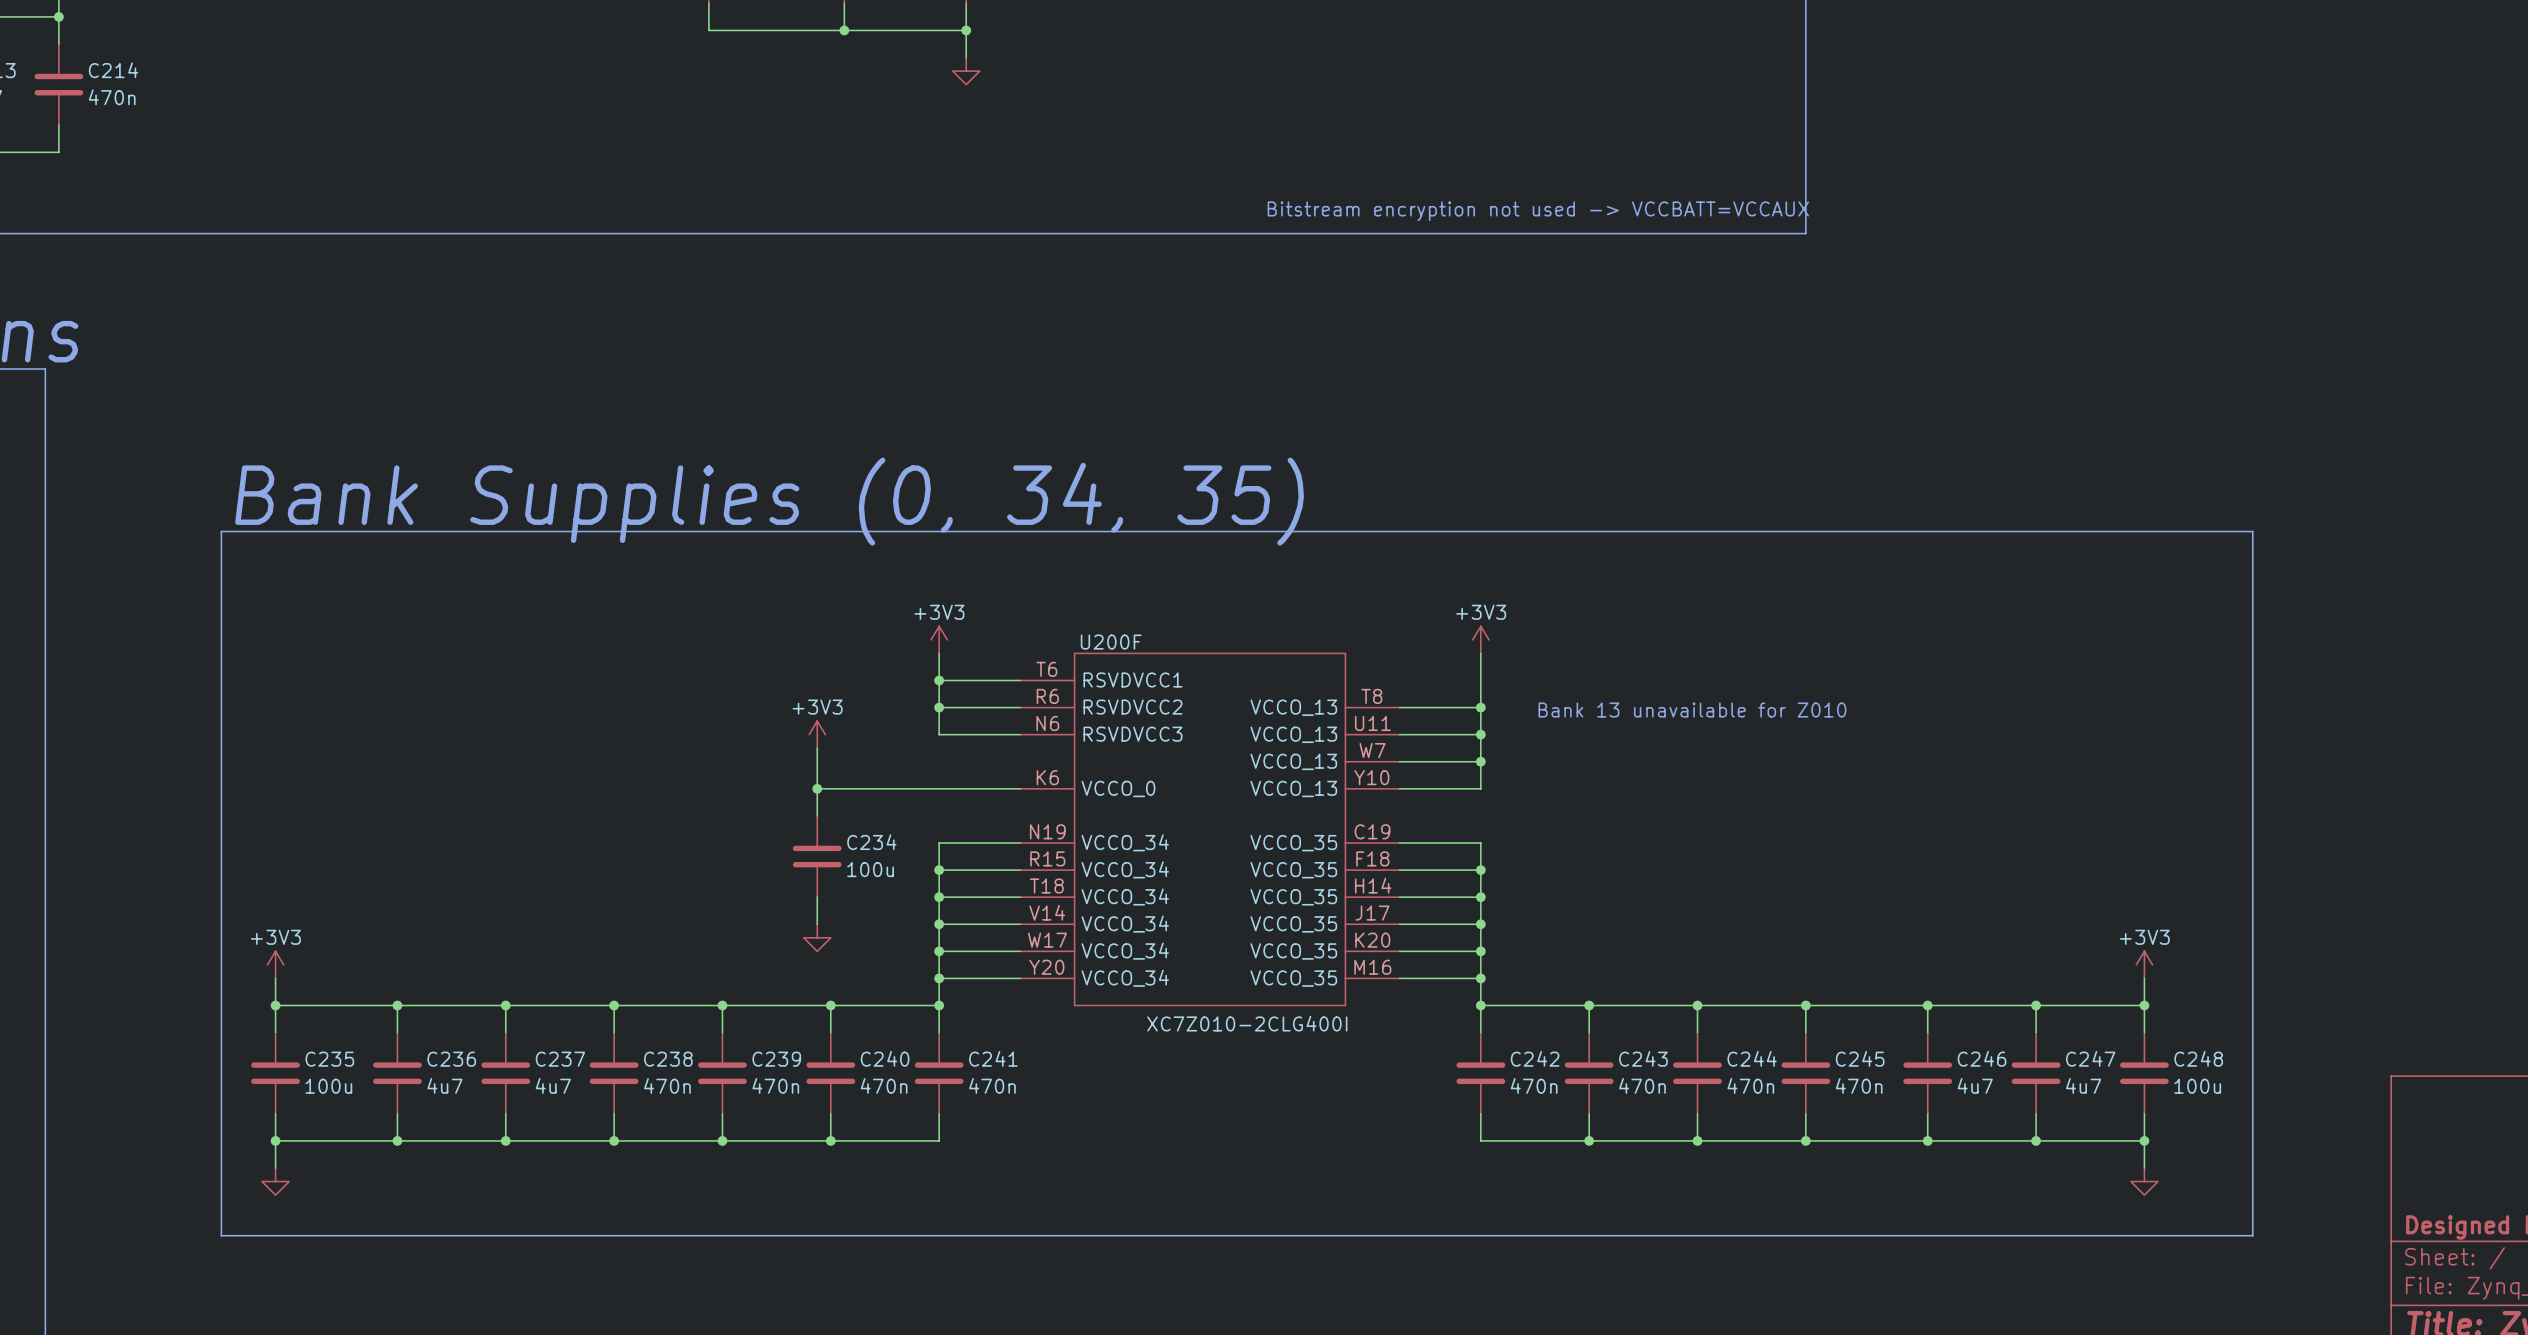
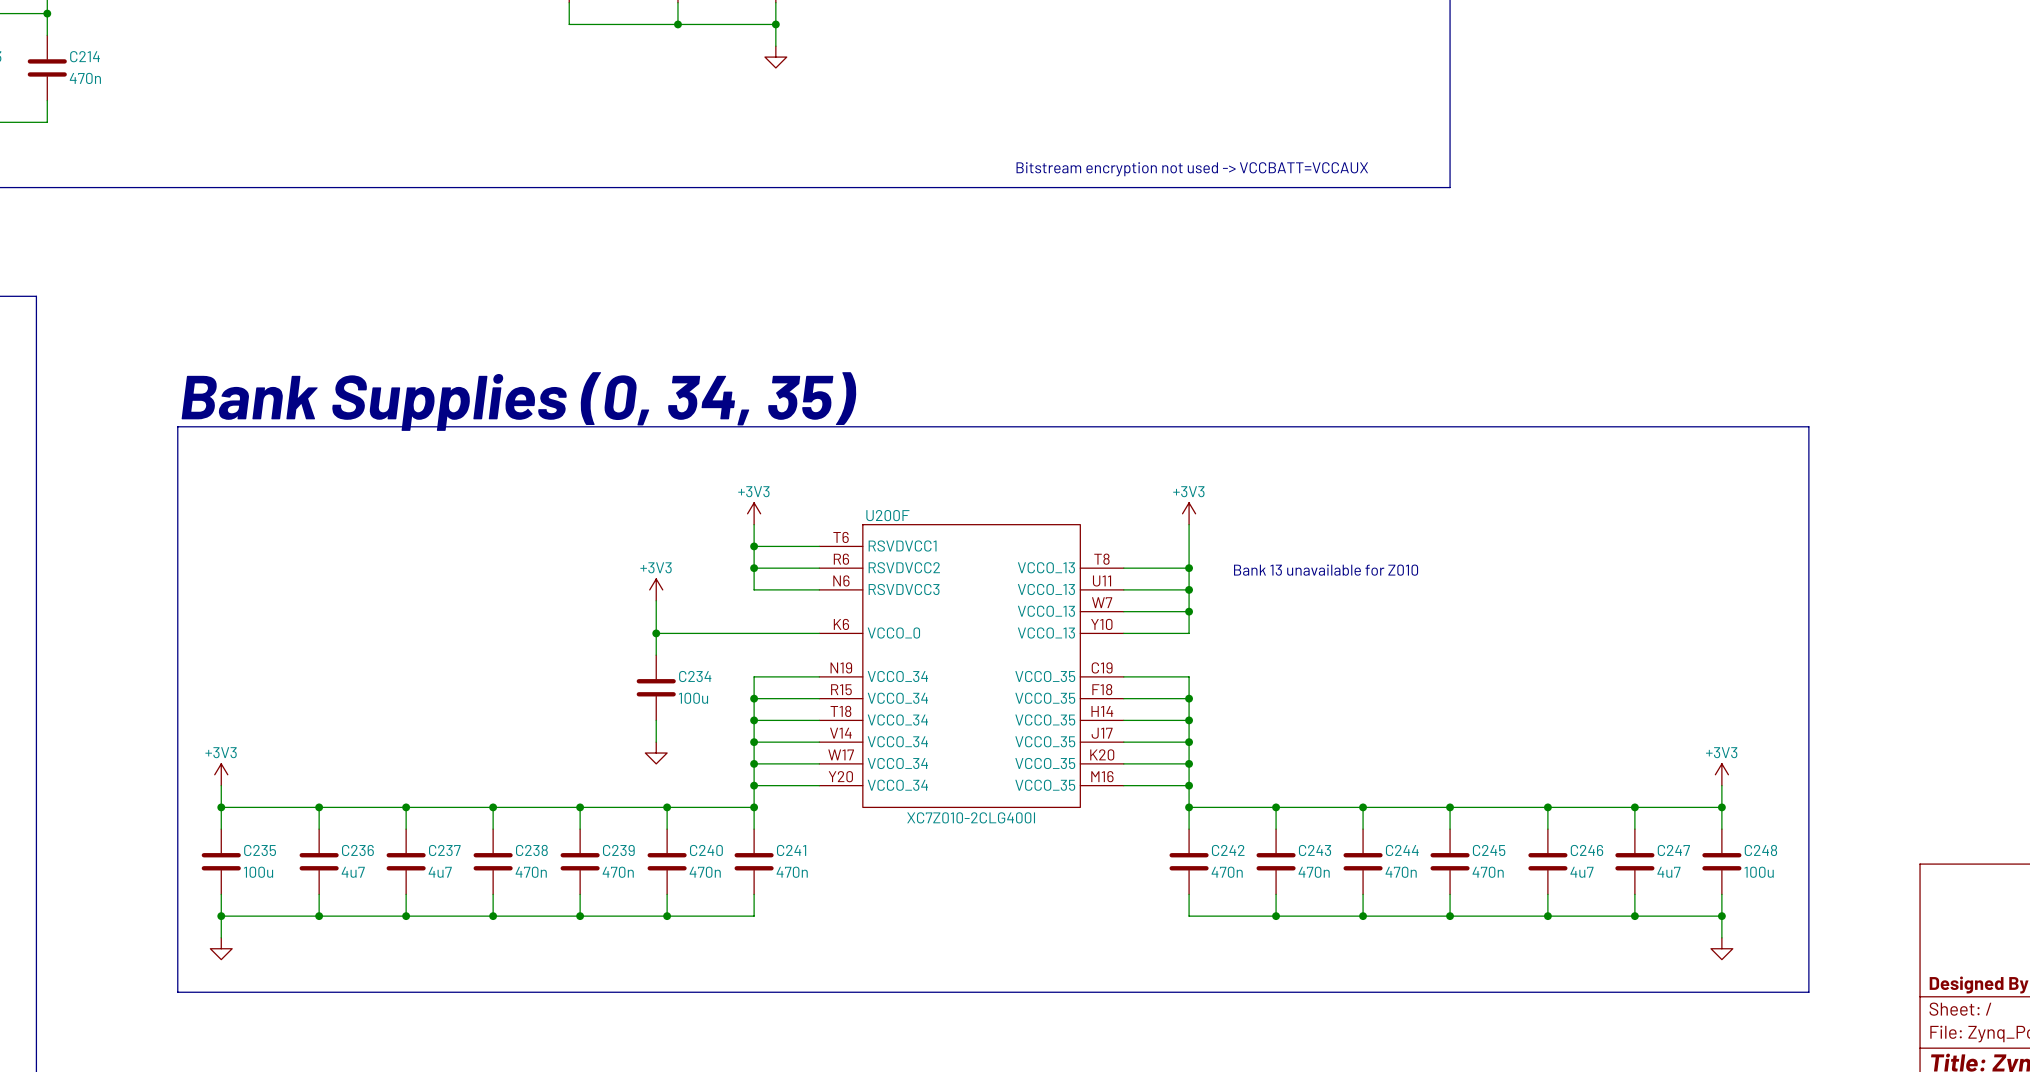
U200F value position: XC7Z010-2CLG400I (1247, 1023) -> XC7Z010-2CLG400I (971, 817)

